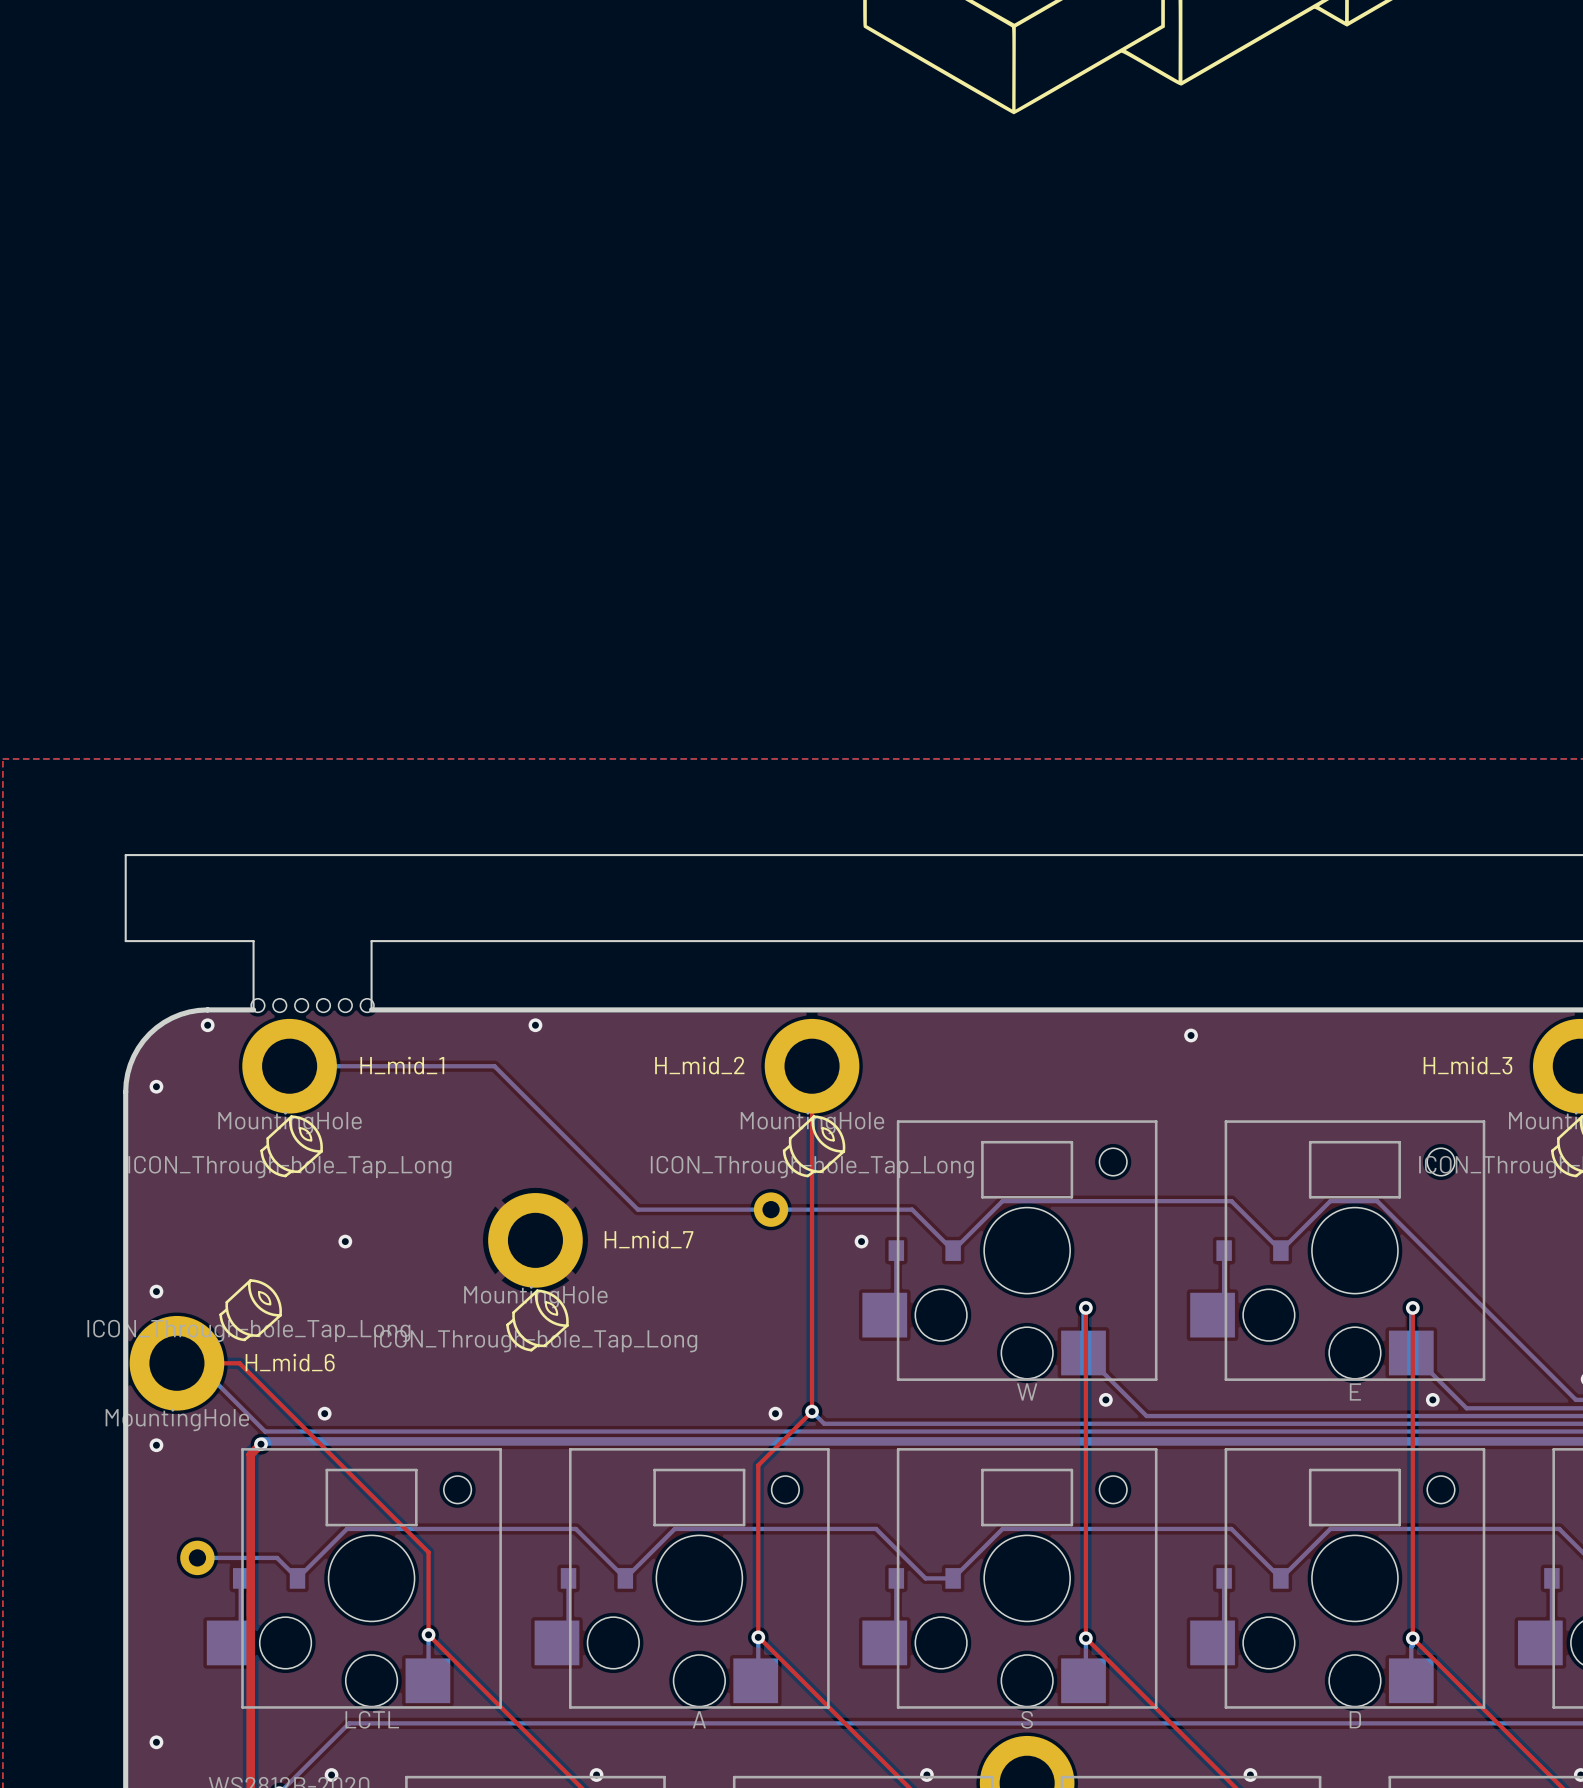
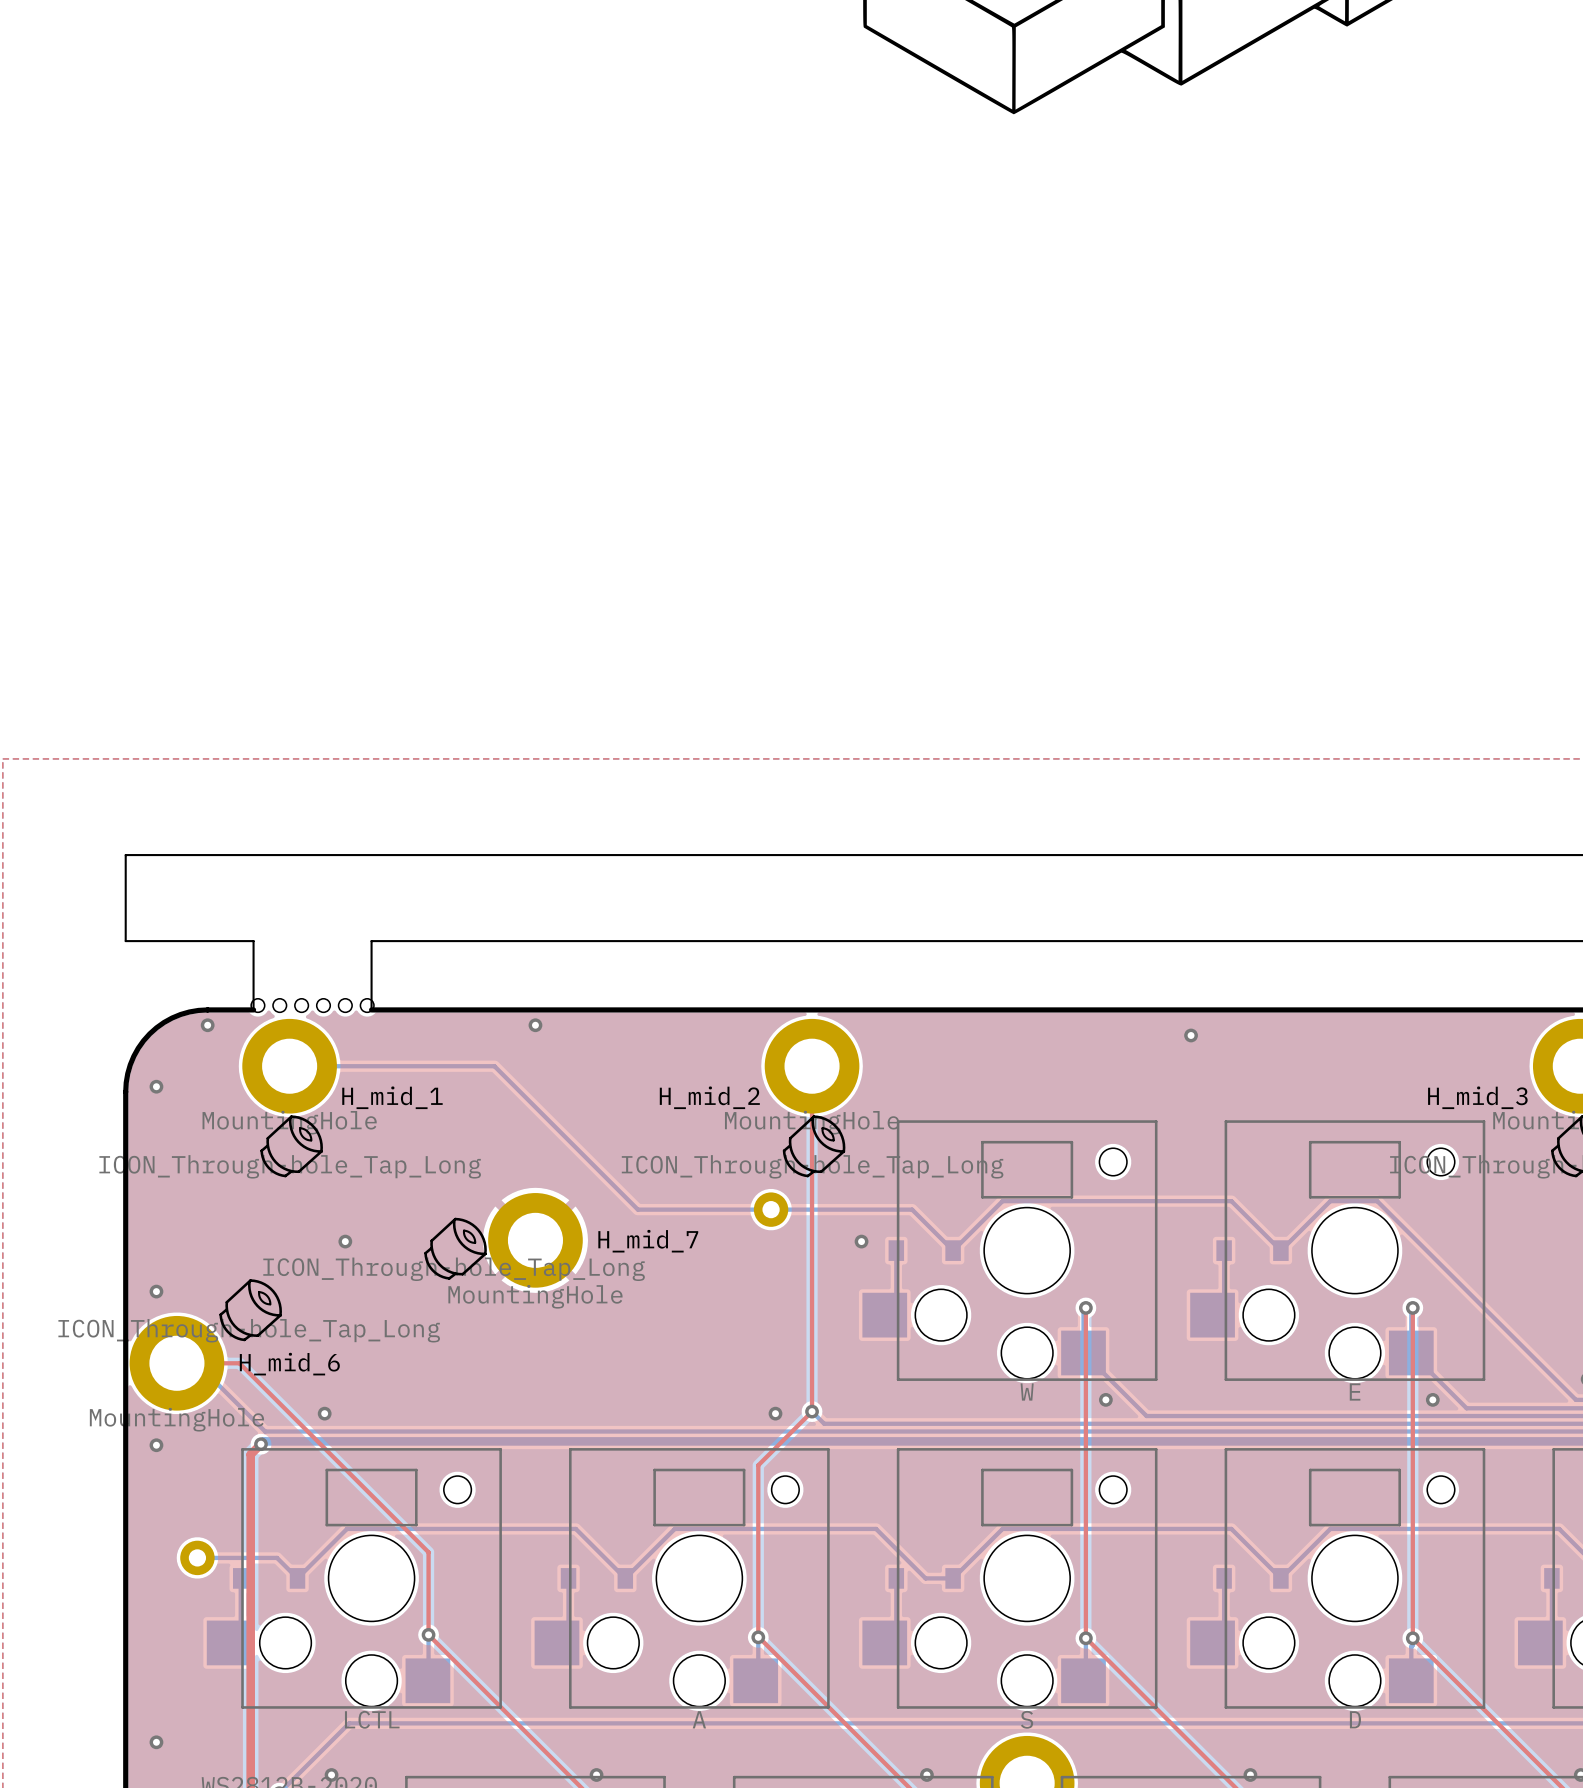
H_mid_1 name position: H_mid_1 (402, 1065) -> H_mid_1 (392, 1097)
H_mid_2 name position: H_mid_2 (699, 1065) -> H_mid_2 (709, 1097)
H_mid_3 name position: H_mid_3 (1467, 1065) -> H_mid_3 (1477, 1097)
drawing position: (537, 1320) -> (455, 1248)

